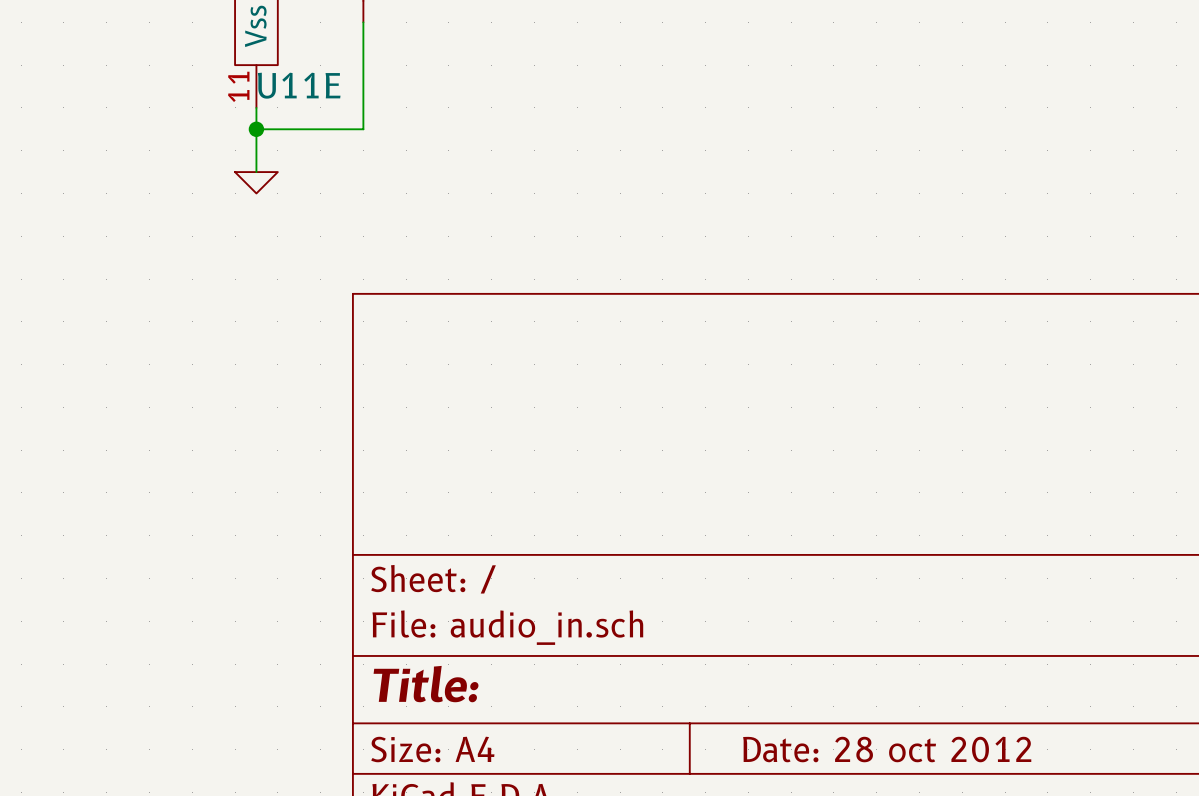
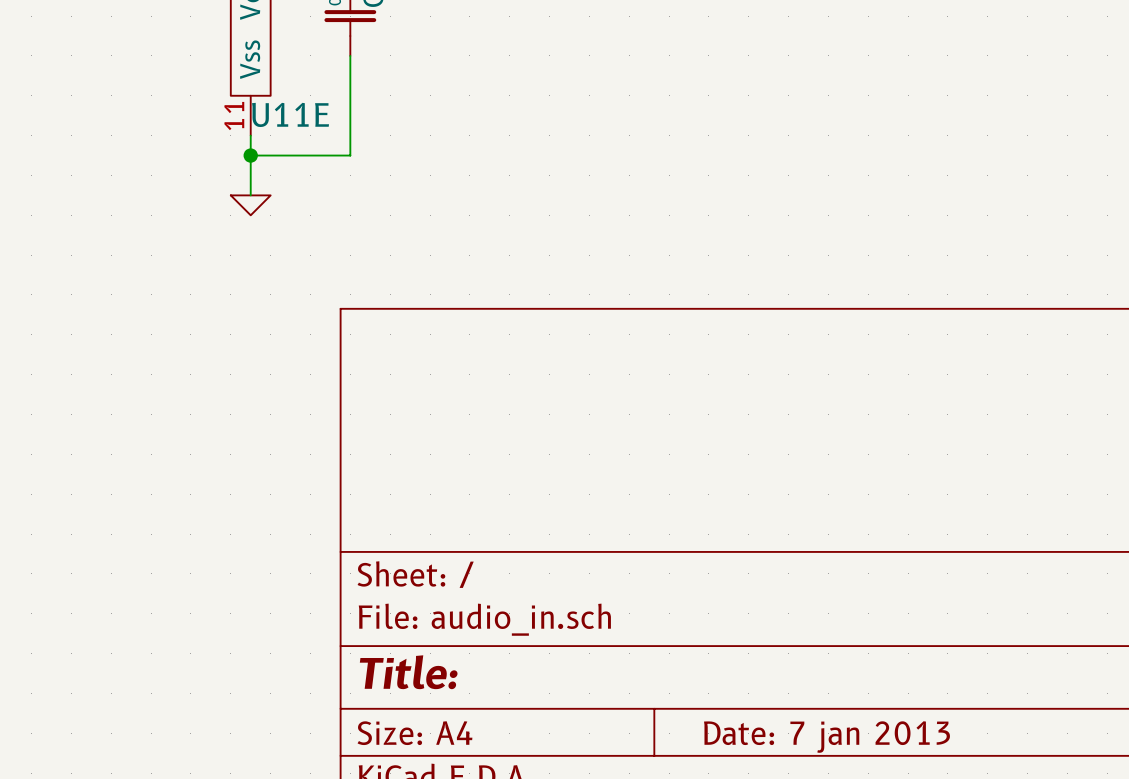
title block: Date: 28 oct 2012 (887, 749) -> Date: 7 jan 2013 (826, 737)

